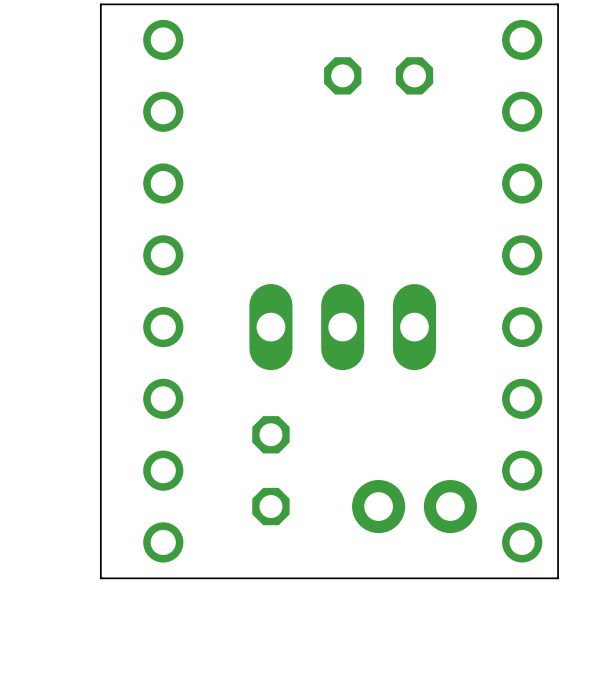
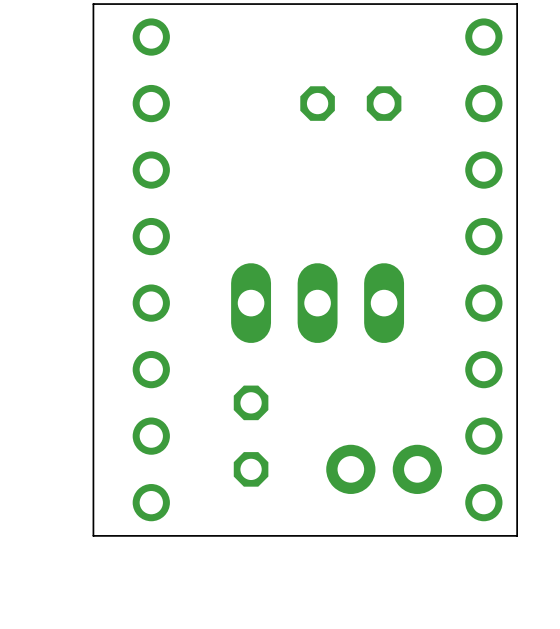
part position: (378, 75) -> (350, 103)

